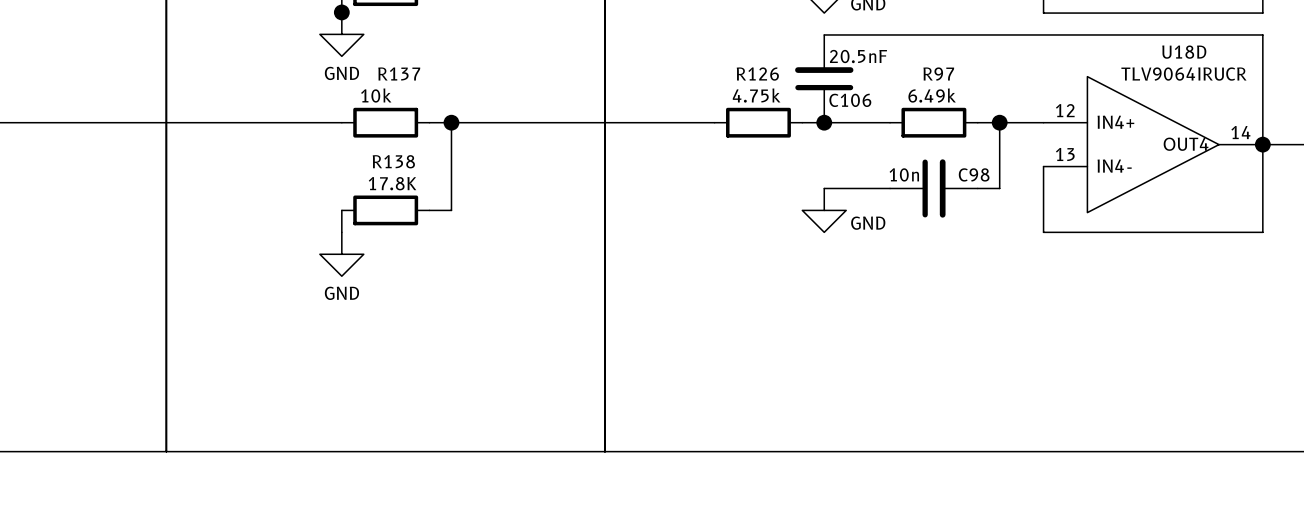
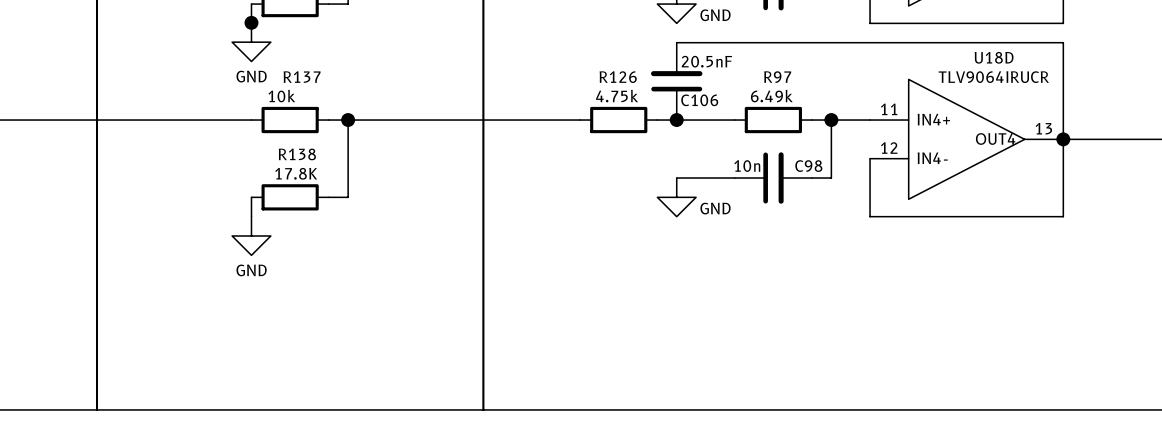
U18D pin number: 12 (1065, 110) -> 11 (889, 109)
U18D pin number: 14 (1240, 132) -> 13 (1043, 128)
U18D pin number: 13 (1065, 154) -> 12 (889, 148)

